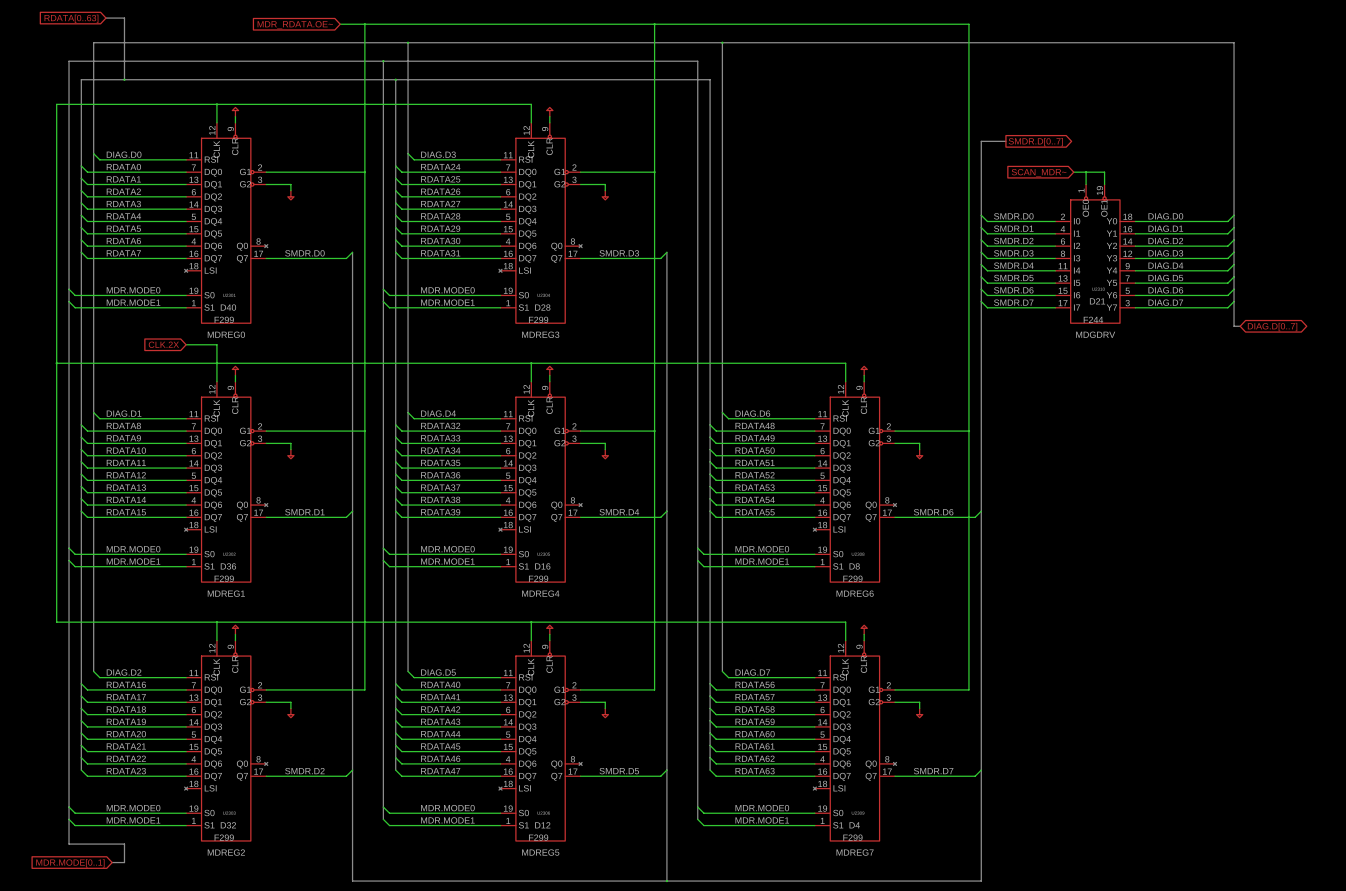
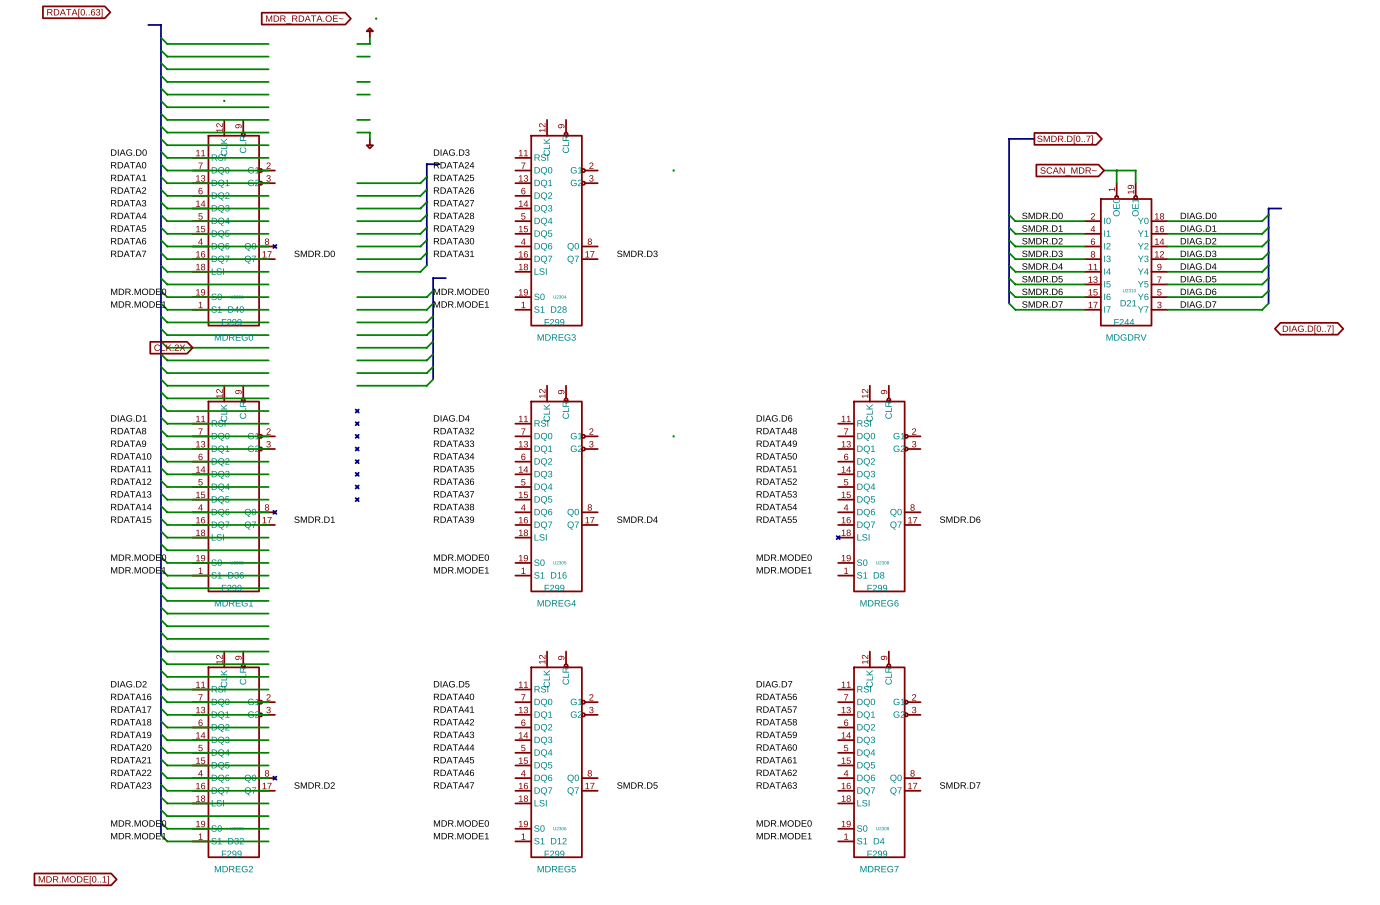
bus: (105, 18) (124, 18) (124, 79) -> none
wire: (340, 24) (968, 24) (968, 689) (894, 689) -> none
wire: (364, 24) (364, 689) (266, 689) -> none
wire: (654, 24) (654, 689) (580, 689) -> none
bus: none -> (148, 24) (160, 24) (160, 835)
power symbol: none -> (369, 32)
wire: none -> (160, 37) (167, 43) (268, 43)
wire: none -> (369, 37) (369, 43) (357, 43)
bus: (408, 42) (408, 671) -> none
junction: (408, 42) -> none
bus: (722, 42) (722, 671) -> none
junction: (722, 42) -> none
bus: (383, 61) (383, 819) -> none
junction: (383, 61) -> none
wire: none -> (160, 62) (167, 69) (268, 69)
junction: (124, 79) -> none
wire: none -> (160, 75) (167, 81) (268, 81)
bus: (395, 79) (395, 770) -> none
junction: (395, 79) -> none
wire: none -> (357, 81) (369, 81)
wire: none -> (160, 88) (167, 94) (268, 94)
wire: none -> (357, 94) (369, 94)
wire: none -> (160, 100) (167, 107) (268, 107)
wire: (216, 104) (216, 122) -> none
power symbol: (235, 111) -> none
power symbol: (549, 111) -> none
wire: none -> (160, 113) (167, 119) (268, 119)
wire: (235, 116) (235, 122) -> none
wire: (549, 116) (549, 122) -> none
wire: none -> (357, 119) (369, 119)
wire: (531, 122) (531, 104) (56, 104) (56, 622) (845, 622) (845, 640) -> none
wire: none -> (160, 126) (167, 132) (268, 132)
wire: none -> (357, 132) (369, 132) (369, 138)
wire: none -> (160, 138) (167, 145) (268, 145)
power symbol: none -> (369, 143)
wire: (93, 153) (99, 159) (161, 159) -> (160, 151) (167, 157)
wire: (408, 153) (414, 159) (500, 159) -> none
wire: none -> (192, 157) (268, 157)
wire: (81, 166) (87, 172) (161, 172) -> (160, 164) (167, 170)
wire: (395, 166) (401, 172) (500, 172) -> none
bus: none -> (439, 164) (426, 164) (426, 265)
wire: none -> (192, 170) (268, 170)
wire: (266, 172) (364, 172) -> none
wire: (580, 172) (654, 172) -> none
wire: (81, 178) (87, 184) (161, 184) -> (160, 176) (167, 183)
wire: (395, 178) (401, 184) -> (357, 183) (414, 183)
wire: none -> (192, 183) (268, 183)
wire: (266, 184) (290, 184) (290, 190) -> none
wire: (408, 184) (500, 184) -> (420, 183) (426, 176)
wire: (580, 184) (605, 184) (605, 190) -> none
wire: (81, 190) (87, 196) (161, 196) -> (160, 189) (167, 195)
wire: (395, 190) (401, 196) -> (357, 195) (414, 195)
power symbol: (290, 195) -> none
power symbol: (605, 195) -> none
wire: none -> (192, 195) (268, 195)
wire: (408, 196) (500, 196) -> (420, 195) (426, 189)
wire: (81, 202) (87, 209) (161, 209) -> (160, 202) (167, 208)
wire: (395, 202) (401, 209) -> (357, 208) (414, 208)
wire: none -> (192, 208) (268, 208)
wire: (408, 209) (500, 209) -> (420, 208) (426, 202)
bus: (1234, 209) (1234, 42) (93, 42) (93, 671) -> (1268, 208) (1281, 208)
wire: (81, 215) (87, 221) (161, 221) -> (160, 214) (167, 221)
wire: (395, 215) (401, 221) -> (357, 221) (414, 221)
wire: none -> (192, 221) (268, 221)
wire: (408, 221) (500, 221) -> (420, 221) (426, 214)
wire: (81, 227) (87, 233) (161, 233) -> (160, 227) (167, 233)
wire: (395, 227) (401, 233) -> (357, 233) (414, 233)
wire: none -> (192, 233) (268, 233)
wire: (408, 233) (500, 233) -> (420, 233) (426, 227)
wire: (81, 239) (87, 246) (161, 246) -> (160, 240) (167, 246)
wire: (395, 239) (401, 246) -> (357, 246) (414, 246)
wire: none -> (192, 246) (268, 246)
wire: (408, 246) (500, 246) -> (420, 246) (426, 240)
no-connect mark: (580, 246) -> none
wire: (81, 252) (87, 258) (161, 258) -> (160, 252) (167, 259)
bus: (352, 252) (352, 881) (981, 881) (981, 301) -> none
wire: (352, 252) (346, 258) (266, 258) -> none
wire: (395, 252) (401, 258) -> (357, 259) (414, 259)
bus: (666, 252) (666, 881) -> none
wire: (666, 252) (660, 258) (580, 258) -> none
wire: none -> (192, 259) (268, 259)
wire: (408, 258) (500, 258) -> (420, 259) (426, 252)
wire: none -> (160, 265) (167, 271) (268, 271)
wire: none -> (426, 265) (420, 271) (357, 271)
no-connect mark: (186, 270) -> none
no-connect mark: (500, 270) -> none
wire: none -> (160, 278) (167, 284) (268, 284)
bus: none -> (445, 278) (433, 278) (433, 379)
wire: (69, 289) (75, 295) (161, 295) -> (160, 290) (167, 297)
wire: (383, 289) (389, 295) -> (357, 297) (401, 297)
wire: none -> (192, 297) (268, 297)
wire: (414, 295) (500, 295) -> (426, 297) (433, 290)
wire: (69, 301) (75, 307) (161, 307) -> (160, 303) (167, 309)
wire: (383, 301) (389, 307) -> (357, 309) (401, 309)
bus: (1234, 301) (1234, 326) (1240, 326) -> none
wire: none -> (192, 309) (268, 309)
wire: (414, 307) (500, 307) -> (426, 309) (433, 303)
wire: none -> (160, 316) (167, 322) (268, 322)
wire: none -> (433, 316) (426, 322) (357, 322)
wire: none -> (160, 328) (167, 335) (268, 335)
wire: none -> (433, 328) (426, 335) (357, 335)
wire: none -> (160, 341) (167, 347) (192, 347)
wire: none -> (433, 341) (426, 347) (357, 347)
wire: (216, 344) (216, 381) -> (224, 347) (268, 347)
wire: none -> (160, 354) (167, 360) (268, 360)
wire: none -> (433, 354) (426, 360) (357, 360)
wire: (56, 363) (845, 363) (845, 381) -> none
wire: none -> (160, 366) (167, 373) (268, 373)
wire: none -> (433, 366) (426, 373) (357, 373)
wire: (531, 363) (531, 381) -> none
power symbol: (235, 370) -> none
power symbol: (549, 370) -> none
power symbol: (864, 370) -> none
wire: none -> (160, 379) (167, 385) (268, 385)
wire: (235, 375) (235, 381) -> none
wire: none -> (433, 379) (426, 385) (357, 385)
wire: (549, 375) (549, 381) -> none
wire: (864, 375) (864, 381) -> none
wire: none -> (160, 392) (167, 398) (268, 398)
wire: none -> (160, 404) (167, 411) (268, 411)
no-connect mark: none -> (357, 411)
wire: (93, 412) (99, 418) (161, 418) -> (160, 417) (167, 423)
wire: (408, 412) (414, 418) (500, 418) -> none
wire: (722, 412) (728, 418) (814, 418) -> none
wire: none -> (192, 423) (268, 423)
no-connect mark: none -> (357, 423)
wire: (81, 424) (87, 431) (161, 431) -> (160, 430) (167, 436)
wire: (395, 424) (401, 431) (500, 431) -> none
wire: (710, 424) (716, 431) (814, 431) -> none
wire: none -> (192, 436) (268, 436)
wire: (266, 431) (364, 431) -> none
no-connect mark: none -> (357, 436)
wire: (580, 431) (654, 431) -> none
wire: (894, 431) (968, 431) -> none
wire: (81, 437) (87, 443) (161, 443) -> (160, 442) (167, 449)
wire: (395, 437) (401, 443) (500, 443) -> none
wire: (710, 437) (716, 443) (814, 443) -> none
wire: none -> (192, 449) (268, 449)
wire: (266, 443) (290, 443) (290, 449) -> none
no-connect mark: none -> (357, 449)
wire: (580, 443) (605, 443) (605, 449) -> none
wire: (894, 443) (919, 443) (919, 449) -> none
wire: (81, 449) (87, 455) (161, 455) -> (160, 455) (167, 461)
wire: (395, 449) (401, 455) (500, 455) -> none
wire: (710, 449) (716, 455) (814, 455) -> none
power symbol: (290, 454) -> none
power symbol: (605, 454) -> none
power symbol: (919, 454) -> none
wire: none -> (192, 461) (268, 461)
no-connect mark: none -> (357, 461)
wire: (81, 461) (87, 468) (161, 468) -> (160, 468) (167, 474)
wire: (395, 461) (401, 468) (500, 468) -> none
wire: (710, 461) (716, 468) (814, 468) -> none
wire: none -> (192, 474) (268, 474)
no-connect mark: none -> (357, 474)
wire: (81, 474) (87, 480) (161, 480) -> (160, 480) (167, 486)
wire: (395, 474) (401, 480) (500, 480) -> none
wire: (710, 474) (716, 480) (814, 480) -> none
wire: none -> (192, 486) (268, 486)
no-connect mark: none -> (357, 486)
wire: (81, 486) (87, 492) (161, 492) -> (160, 493) (167, 499)
wire: (395, 486) (401, 492) (500, 492) -> none
wire: (710, 486) (716, 492) (814, 492) -> none
wire: none -> (192, 499) (268, 499)
no-connect mark: none -> (357, 499)
wire: (81, 498) (87, 505) (161, 505) -> (160, 505) (167, 512)
wire: (395, 498) (401, 505) (500, 505) -> none
wire: (710, 498) (716, 505) (814, 505) -> none
wire: none -> (192, 512) (268, 512)
no-connect mark: (580, 505) -> none
no-connect mark: (894, 505) -> none
wire: (81, 511) (87, 517) (161, 517) -> (160, 518) (167, 524)
wire: (352, 511) (346, 517) (266, 517) -> none
wire: (395, 511) (401, 517) (500, 517) -> none
wire: (666, 511) (660, 517) (580, 517) -> none
wire: (710, 511) (716, 517) (814, 517) -> none
wire: (981, 511) (975, 517) (894, 517) -> none
wire: none -> (192, 524) (268, 524)
wire: none -> (160, 531) (167, 537) (268, 537)
no-connect mark: (186, 529) -> none
no-connect mark: (500, 529) -> none
wire: none -> (160, 543) (167, 550) (268, 550)
wire: (69, 548) (75, 554) (161, 554) -> (160, 556) (167, 562)
wire: (383, 548) (389, 554) (500, 554) -> none
wire: (697, 548) (703, 554) (814, 554) -> none
wire: none -> (192, 562) (268, 562)
wire: (69, 560) (75, 566) (161, 566) -> (160, 569) (167, 575)
wire: (383, 560) (389, 566) (500, 566) -> none
wire: (697, 560) (703, 566) (814, 566) -> none
wire: none -> (192, 575) (268, 575)
wire: none -> (160, 581) (167, 588) (268, 588)
wire: none -> (160, 594) (167, 600) (268, 600)
wire: none -> (160, 607) (167, 613) (268, 613)
wire: none -> (160, 619) (167, 626) (268, 626)
wire: none -> (160, 632) (167, 638) (268, 638)
wire: (216, 622) (216, 640) -> none
wire: (531, 622) (531, 640) -> none
power symbol: (235, 629) -> none
power symbol: (549, 629) -> none
power symbol: (864, 629) -> none
wire: none -> (160, 645) (167, 651) (268, 651)
wire: (235, 634) (235, 640) -> none
wire: (549, 634) (549, 640) -> none
wire: (864, 634) (864, 640) -> none
wire: none -> (160, 657) (167, 664) (268, 664)
wire: none -> (160, 670) (167, 676) (268, 676)
wire: (93, 671) (99, 677) (161, 677) -> (160, 683) (167, 689)
wire: (408, 671) (414, 677) (500, 677) -> none
wire: (722, 671) (728, 677) (814, 677) -> none
wire: none -> (192, 689) (268, 689)
wire: (81, 683) (87, 689) (161, 689) -> (160, 695) (167, 702)
wire: (395, 683) (401, 689) (500, 689) -> none
wire: (710, 683) (716, 689) (814, 689) -> none
wire: none -> (192, 702) (268, 702)
wire: (81, 696) (87, 702) (161, 702) -> (160, 708) (167, 714)
wire: (395, 696) (401, 702) (500, 702) -> none
wire: (710, 696) (716, 702) (814, 702) -> none
wire: none -> (192, 714) (268, 714)
wire: (266, 702) (290, 702) (290, 708) -> none
wire: (580, 702) (605, 702) (605, 708) -> none
wire: (894, 702) (919, 702) (919, 708) -> none
wire: (81, 708) (87, 714) (161, 714) -> (160, 721) (167, 727)
wire: (395, 708) (401, 714) (500, 714) -> none
wire: (710, 708) (716, 714) (814, 714) -> none
power symbol: (290, 713) -> none
power symbol: (605, 713) -> none
power symbol: (919, 713) -> none
wire: none -> (192, 727) (268, 727)
wire: (81, 720) (87, 726) (161, 726) -> (160, 733) (167, 740)
wire: (395, 720) (401, 726) (500, 726) -> none
wire: (710, 720) (716, 726) (814, 726) -> none
wire: none -> (192, 740) (268, 740)
wire: (81, 733) (87, 739) (161, 739) -> (160, 746) (167, 752)
wire: (395, 733) (401, 739) (500, 739) -> none
wire: (710, 733) (716, 739) (814, 739) -> none
wire: none -> (192, 752) (268, 752)
wire: (81, 745) (87, 751) (161, 751) -> (160, 759) (167, 765)
wire: (395, 745) (401, 751) (500, 751) -> none
wire: (710, 745) (716, 751) (814, 751) -> none
wire: none -> (192, 765) (268, 765)
wire: (81, 757) (87, 763) (161, 763) -> (160, 771) (167, 778)
wire: (395, 757) (401, 763) (500, 763) -> none
wire: (710, 757) (716, 763) (814, 763) -> none
wire: none -> (192, 778) (268, 778)
no-connect mark: (580, 763) -> none
no-connect mark: (894, 763) -> none
bus: (81, 770) (81, 79) (710, 79) (710, 770) -> none
wire: (81, 770) (87, 776) (161, 776) -> (160, 784) (167, 790)
wire: (352, 770) (346, 776) (266, 776) -> none
wire: (395, 770) (401, 776) (500, 776) -> none
wire: (666, 770) (660, 776) (580, 776) -> none
wire: (710, 770) (716, 776) (814, 776) -> none
wire: (981, 770) (975, 776) (894, 776) -> none
wire: none -> (192, 790) (268, 790)
wire: none -> (160, 797) (167, 803) (268, 803)
no-connect mark: (186, 788) -> none
no-connect mark: (500, 788) -> none
no-connect mark: (814, 788) -> none
wire: none -> (160, 809) (167, 816) (268, 816)
wire: (69, 807) (75, 813) (161, 813) -> (160, 822) (167, 828)
wire: (383, 807) (389, 813) (500, 813) -> none
wire: (697, 807) (703, 813) (814, 813) -> none
wire: none -> (192, 828) (268, 828)
wire: (69, 819) (75, 825) (161, 825) -> (160, 835) (167, 841)
wire: (383, 819) (389, 825) (500, 825) -> none
bus: (697, 819) (697, 61) (69, 61) (69, 844) (124, 844) (124, 862) (112, 862) -> none
wire: (697, 819) (703, 825) (814, 825) -> none
wire: none -> (192, 841) (268, 841)
junction: (666, 881) -> none

